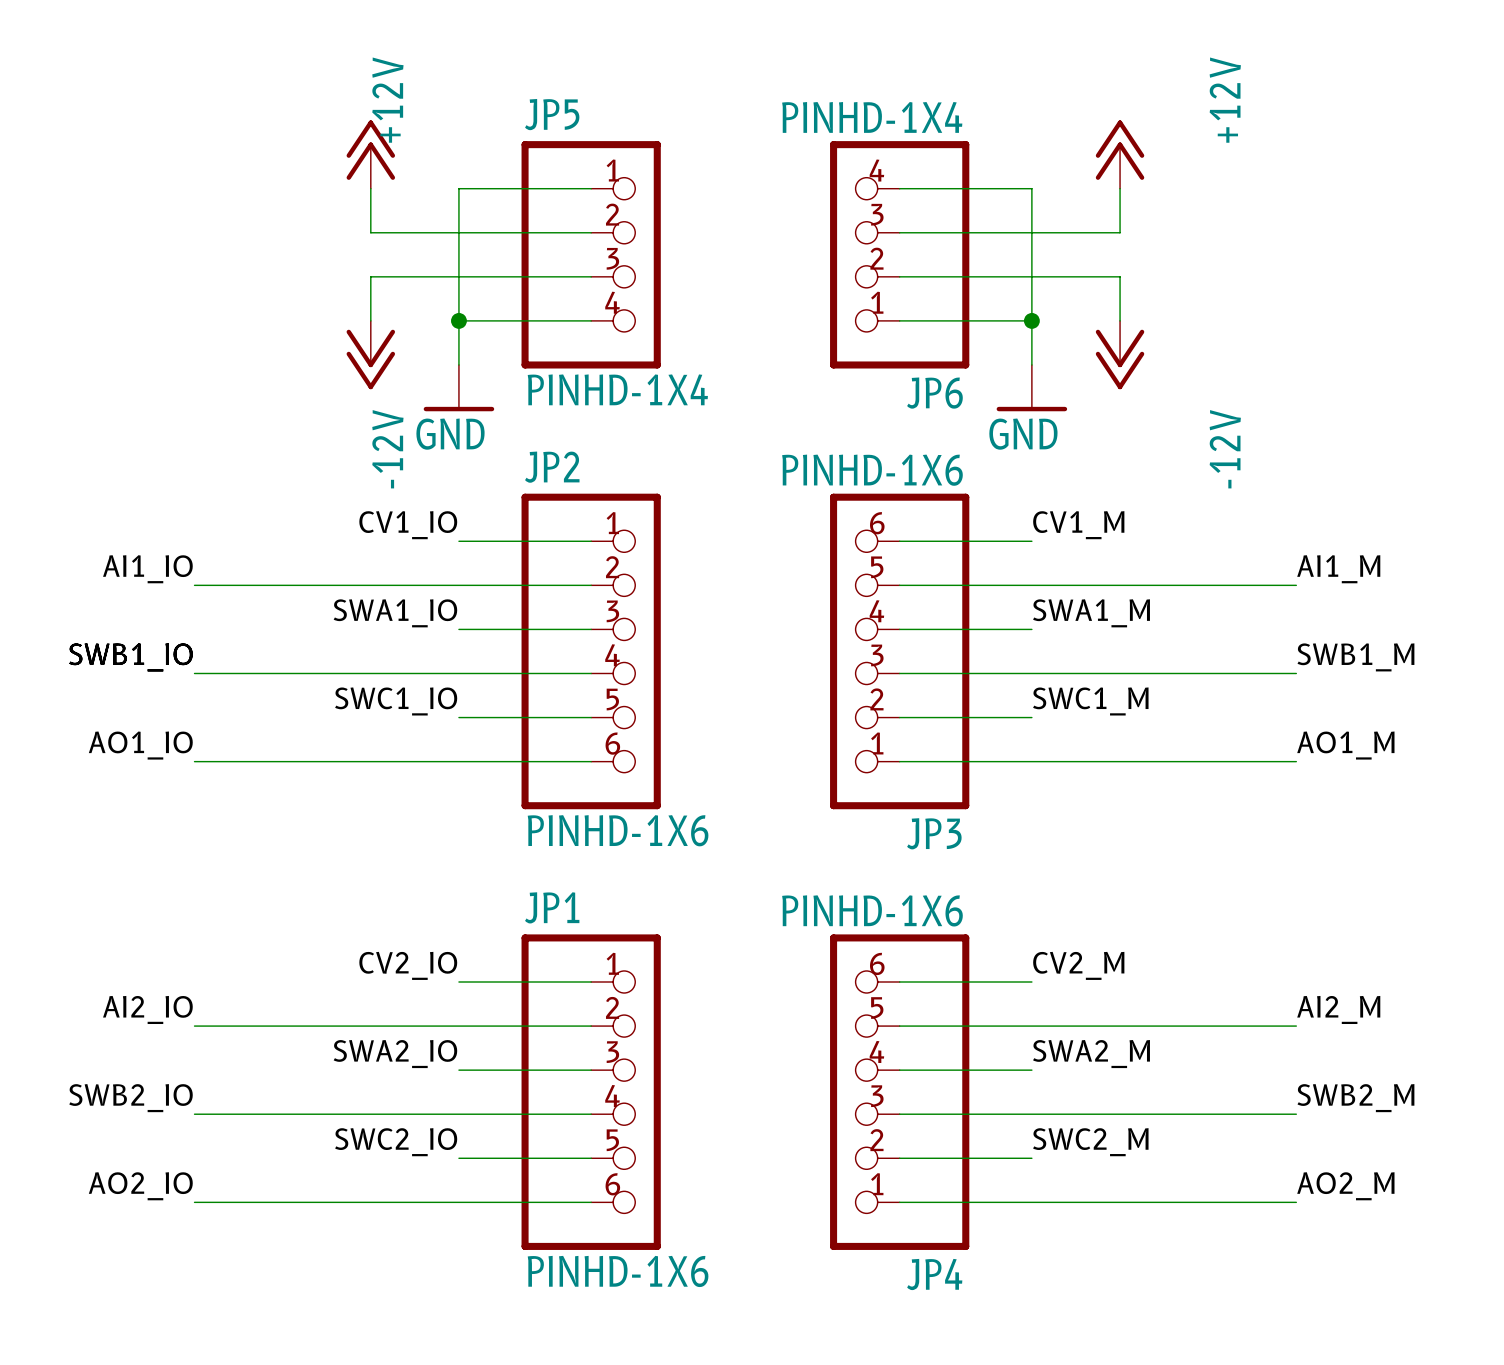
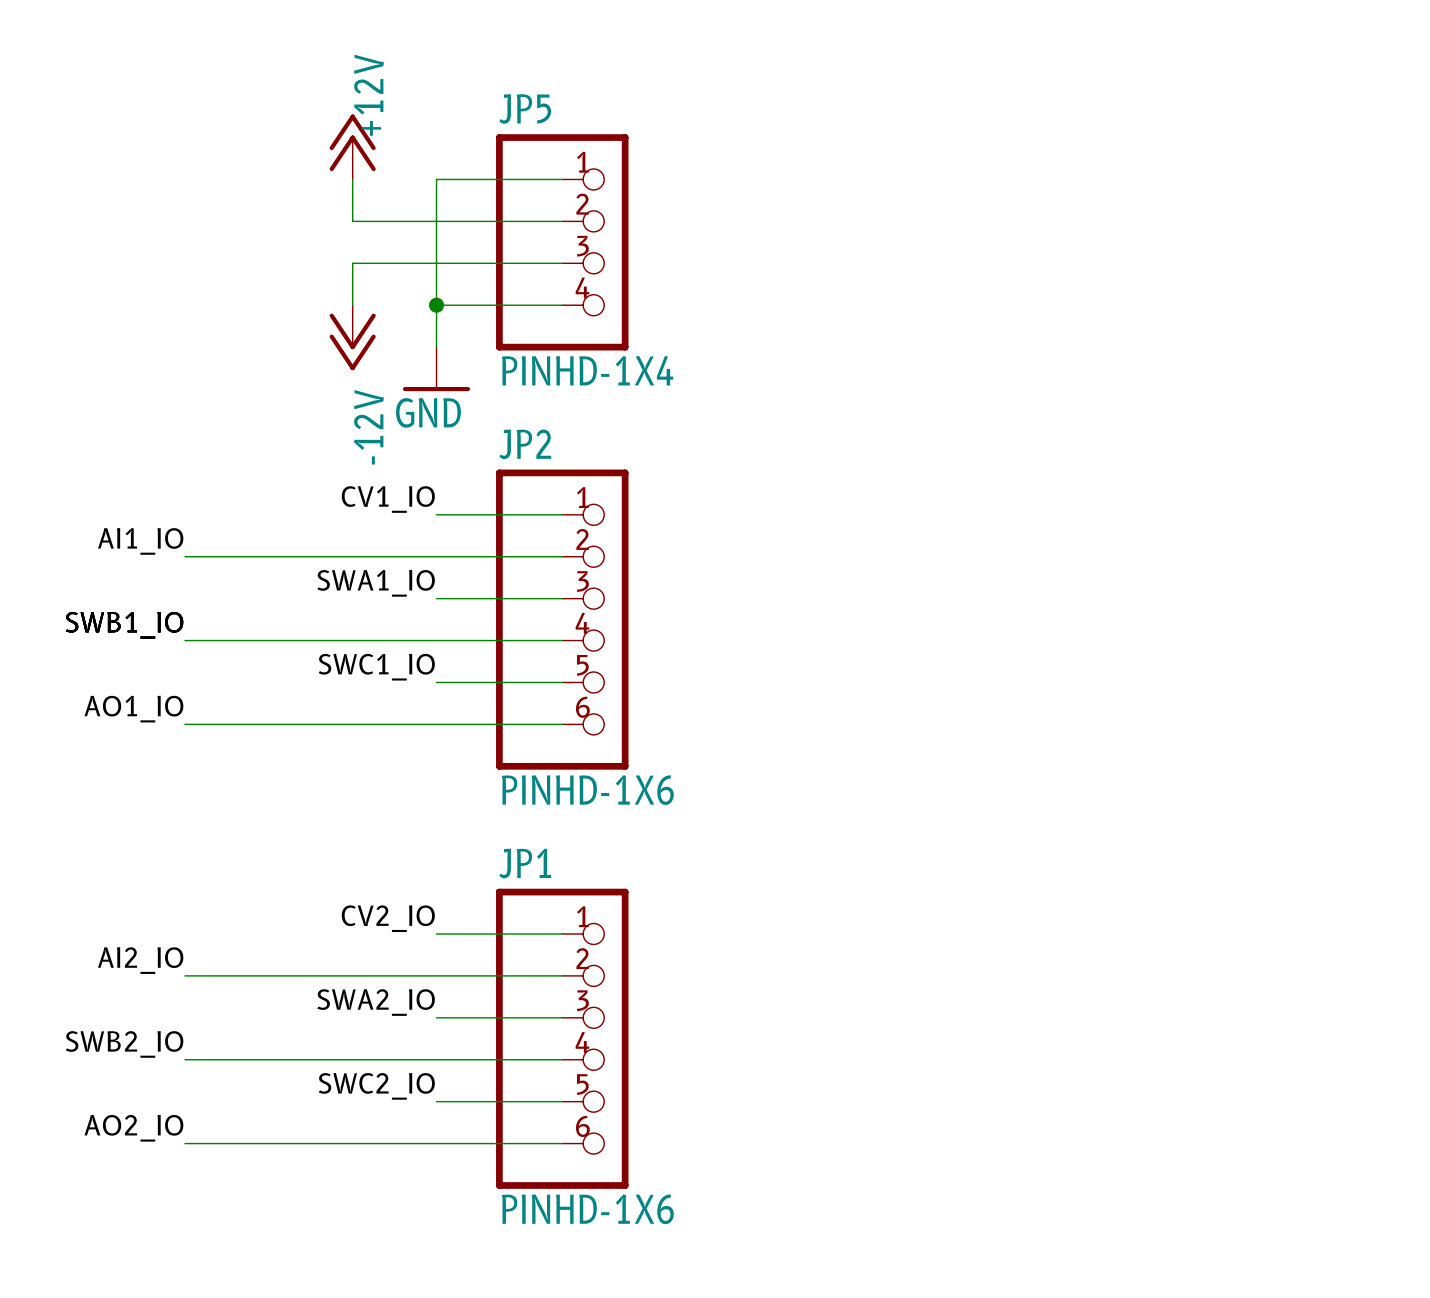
power symbol: +12V (1120, 154) -> none
wire: (899, 188) (1031, 188) (1031, 364) -> none
wire: (1120, 188) (1120, 232) (899, 232) -> none
JP6: PINHD-1X4 (899, 254) -> none
wire: (899, 276) (1120, 276) (1120, 320) -> none
wire: (899, 320) (1031, 320) -> none
junction: (1031, 320) -> none
power symbol: -12V (1120, 355) -> none
power symbol: GND (1031, 388) -> none
label: CV1_M (1078, 525) -> none
wire: (899, 541) (1031, 541) -> none
label: AI1_M (1338, 569) -> none
wire: (899, 585) (1296, 585) -> none
label: SWA1_M (1091, 613) -> none
wire: (899, 629) (1031, 629) -> none
JP3: PINHD-1X6 (899, 651) -> none
label: SWB1_M (1355, 657) -> none
wire: (899, 673) (1296, 673) -> none
label: SWC1_M (1090, 701) -> none
wire: (899, 717) (1031, 717) -> none
label: AO1_M (1345, 745) -> none
wire: (899, 761) (1296, 761) -> none
label: CV2_M (1078, 965) -> none
wire: (899, 981) (1031, 981) -> none
label: AI2_M (1338, 1009) -> none
wire: (899, 1026) (1296, 1026) -> none
label: SWA2_M (1091, 1054) -> none
wire: (899, 1070) (1031, 1070) -> none
JP4: PINHD-1X6 (899, 1092) -> none
label: SWB2_M (1355, 1098) -> none
wire: (899, 1114) (1296, 1114) -> none
label: SWC2_M (1090, 1142) -> none
wire: (899, 1158) (1031, 1158) -> none
label: AO2_M (1345, 1186) -> none
wire: (899, 1202) (1296, 1202) -> none

